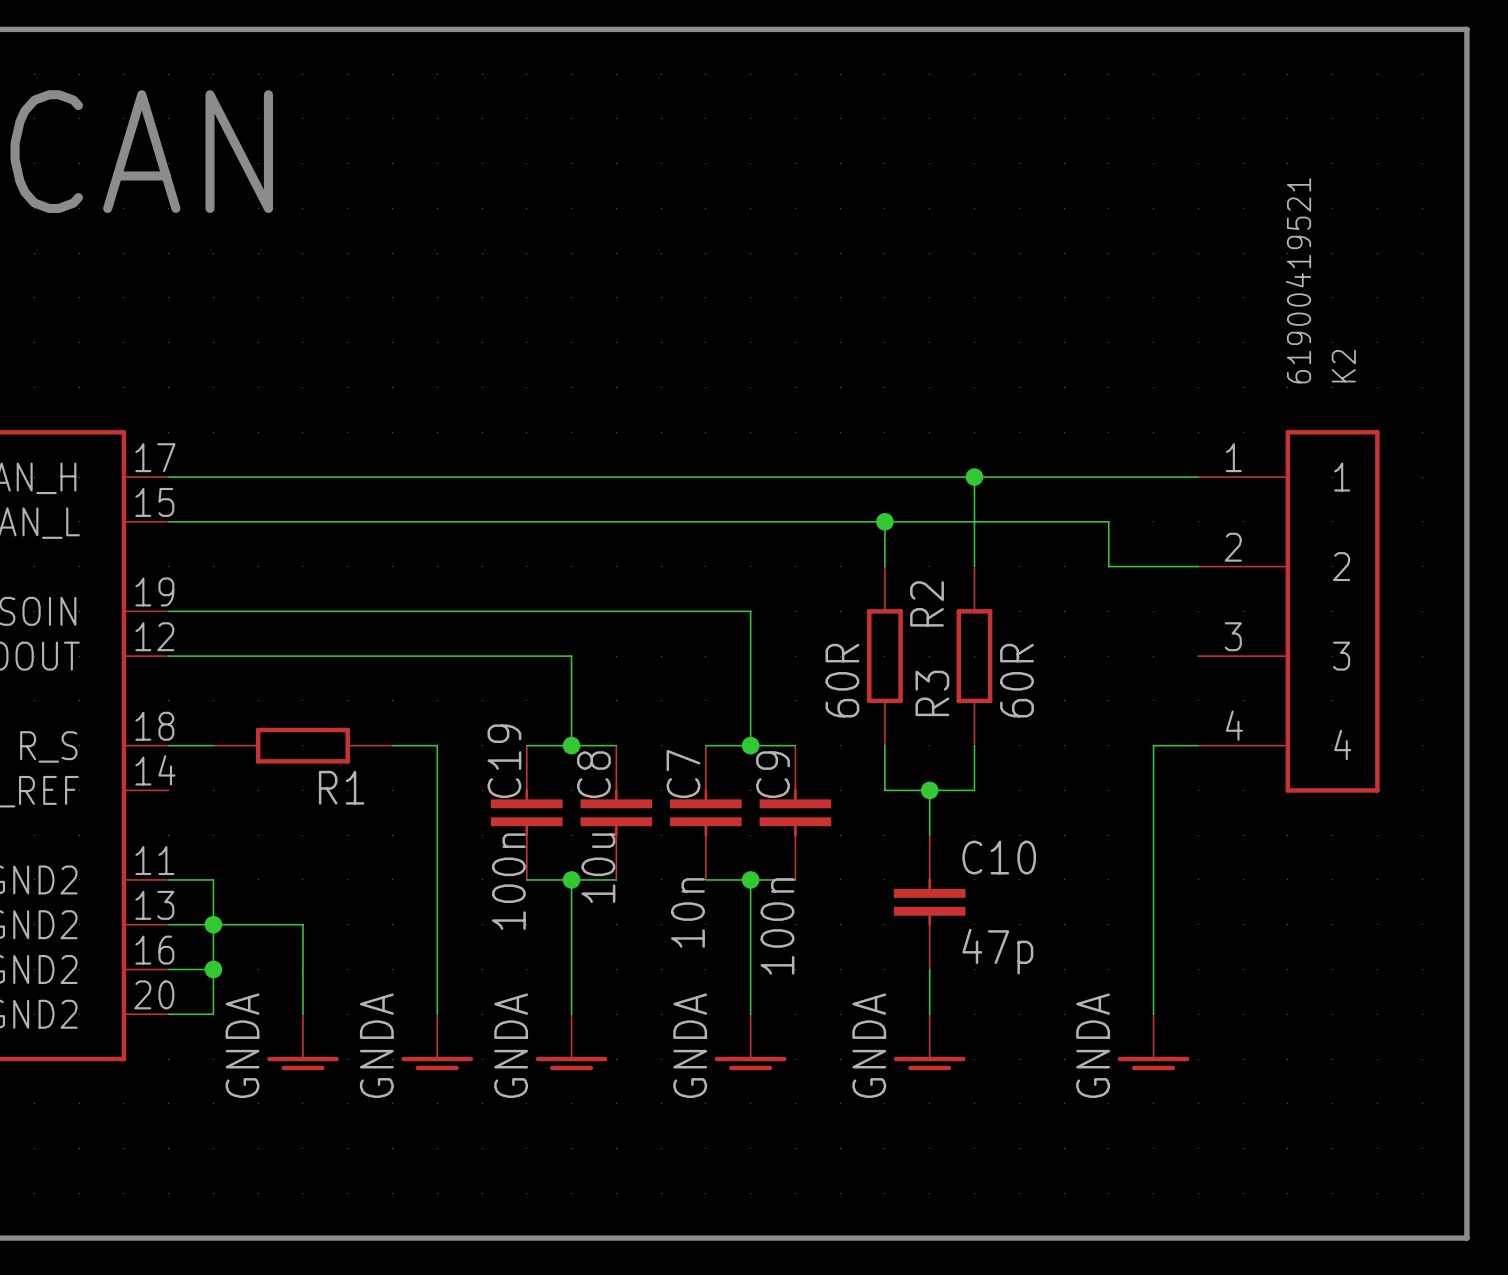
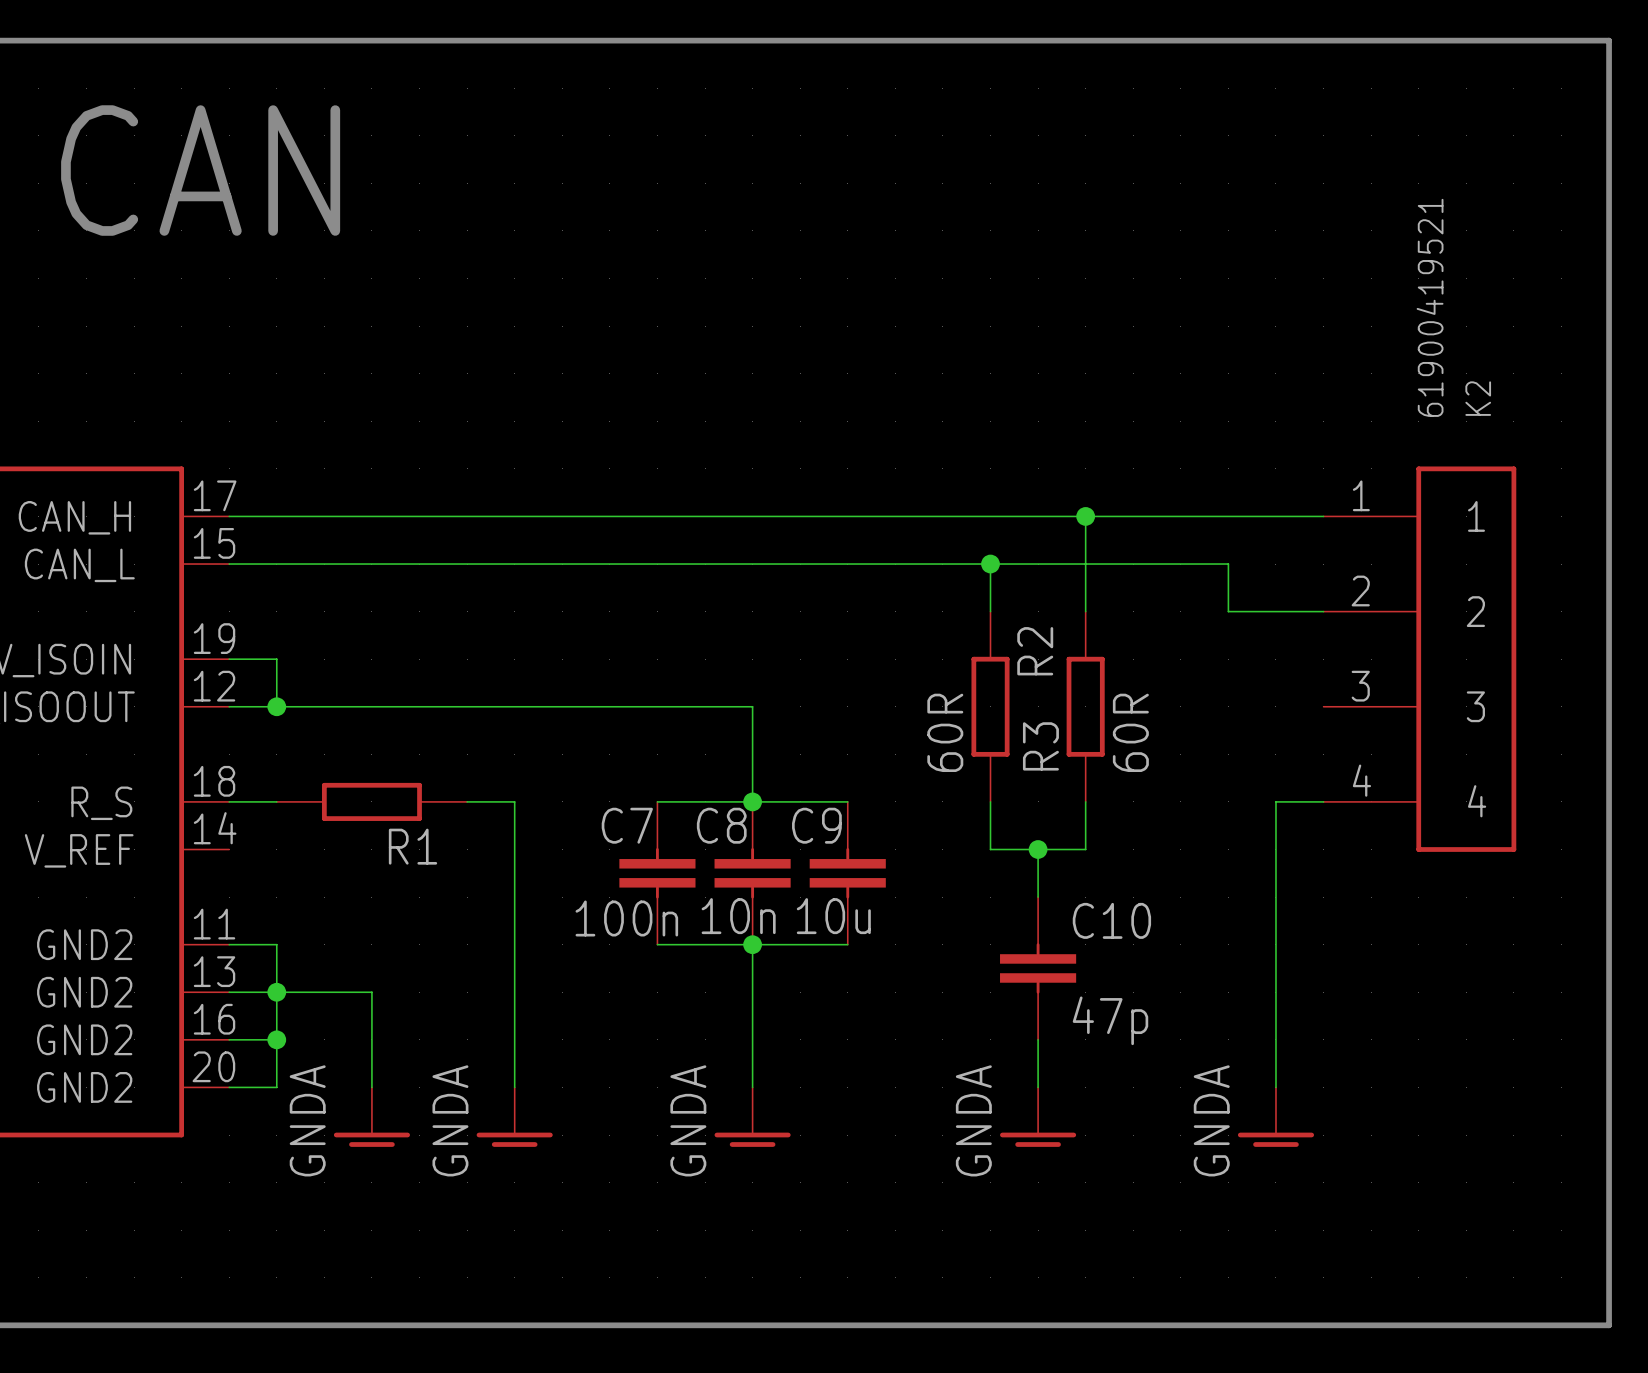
wire: (213, 611) (750, 611) (750, 745) (795, 745) -> (276, 659) (276, 706)
junction: none -> (276, 706)
wire: (571, 656) (571, 745) (526, 745) -> (657, 706) (752, 706) (752, 801)
junction: (571, 745) -> none
wire: none -> (705, 801) (800, 801)
junction: none -> (752, 801)
junction: (750, 745) -> none
C7 name rotation: 0° (683, 773) -> 90° clockwise (627, 825)
C8 name rotation: 0° (593, 774) -> 90° clockwise (721, 825)
C9 name rotation: 0° (773, 774) -> 90° clockwise (816, 825)
C19: 100n (526, 812) -> none
C8 position: (616, 812) -> (752, 873)
C7 position: (705, 812) -> (657, 873)
C9 position: (795, 812) -> (847, 873)
C8 value: 10u (598, 868) -> 10n (738, 916)
wire: (526, 879) (571, 879) (571, 1014) -> none
junction: (571, 879) -> none
wire: none -> (705, 944) (800, 944)
wire: none -> (752, 944) (752, 1087)
junction: none -> (752, 944)
junction: (750, 879) -> none
wire: (795, 879) (750, 879) (750, 1014) -> none
C7 value: 10n (687, 912) -> 100n (626, 918)
C9 value: 100n (777, 926) -> 10u (833, 916)
power symbol: GNDA (571, 1042) -> none
power symbol: none -> GNDA (752, 1117)
power symbol: GNDA (750, 1042) -> none

